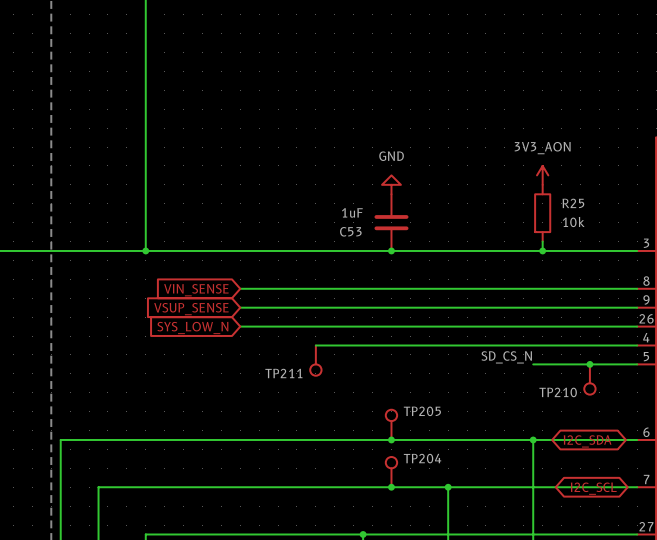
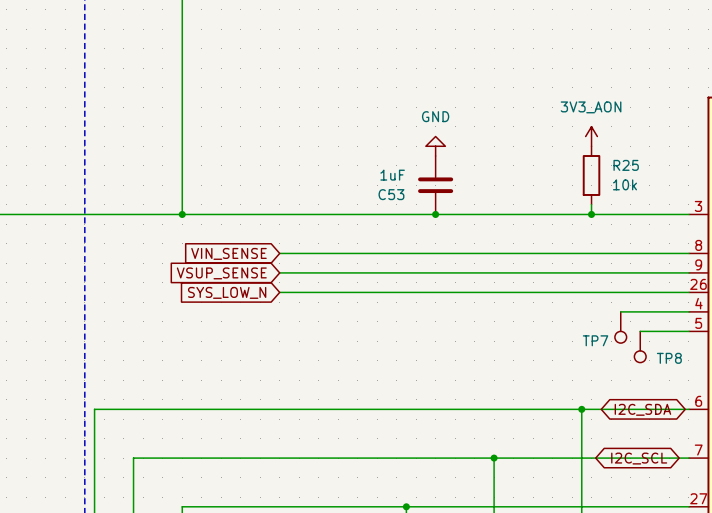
wire: (315, 345) (571, 345) -> none
label: SD_CS_N (506, 357) -> none
TP211: (315, 360) -> none
TP7: none -> (620, 327)
wire: (533, 364) (589, 364) -> none
junction: (589, 364) -> none
TP210 name: TP210 (558, 392) -> TP8 (669, 358)
TP205: (391, 424) -> none
junction: (391, 439) -> none
TP204: (391, 472) -> none
junction: (391, 487) -> none

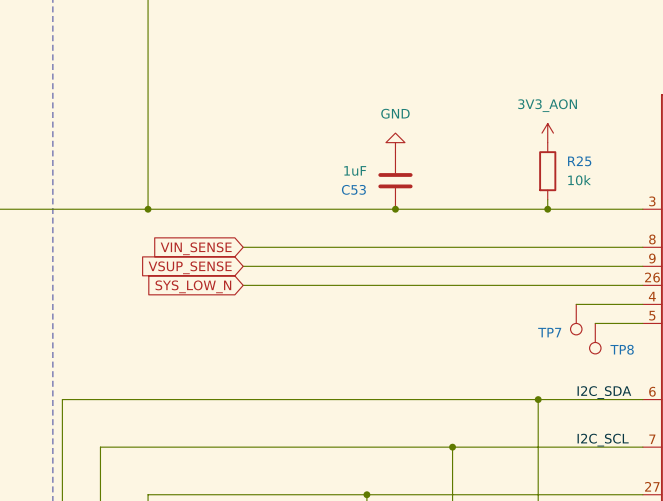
label: none -> I2C_SDA (604, 392)
global label: I2C_SDA (642, 409) -> none
label: none -> I2C_SCL (603, 440)
global label: I2C_SCL (639, 458) -> none

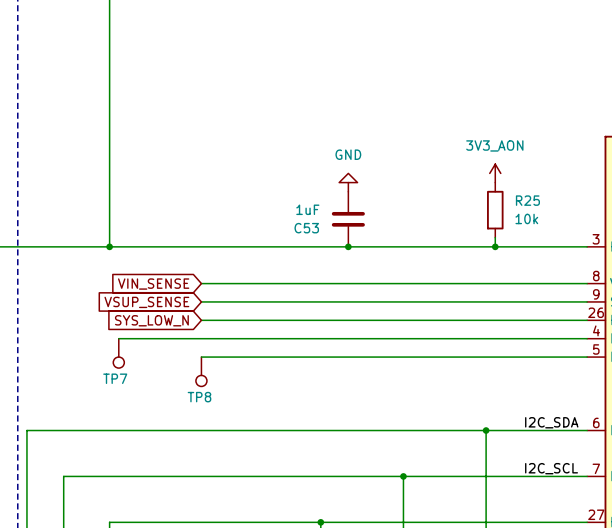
wire: none -> (118, 338) (522, 338)
TP7 position: (576, 319) -> (118, 353)
wire: none -> (201, 357) (541, 357)
TP7 name position: TP7 (549, 332) -> TP7 (115, 378)
TP8 position: (595, 338) -> (201, 371)
TP8 name position: TP8 (622, 349) -> TP8 (199, 397)

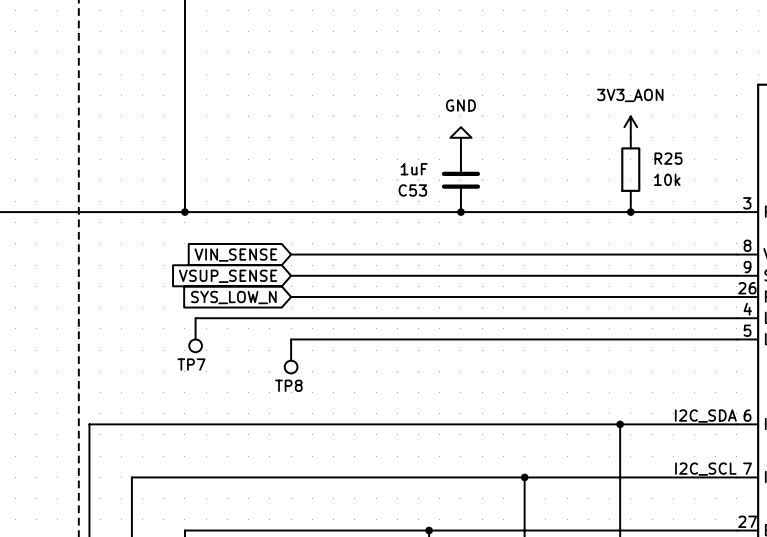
label: I2C_SDA (551, 422) -> none
text: none -> I2C_SDA (705, 416)
label: I2C_SCL (551, 468) -> none
text: none -> I2C_SCL (705, 469)

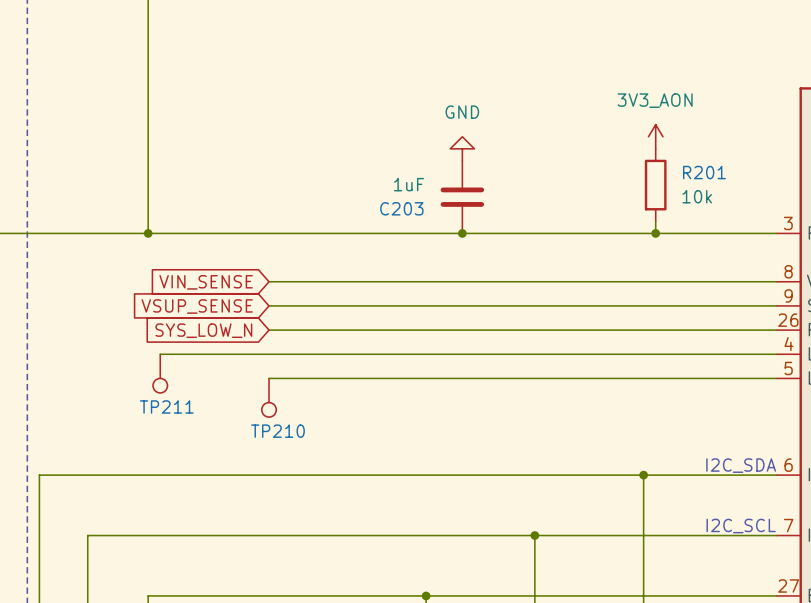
R25 name: R25 (668, 158) -> R201 (704, 172)
C53 name: C53 (412, 190) -> C203 (401, 208)
TP7 name: TP7 (191, 364) -> TP211 (166, 406)
TP8 name: TP8 (288, 385) -> TP210 (277, 431)

